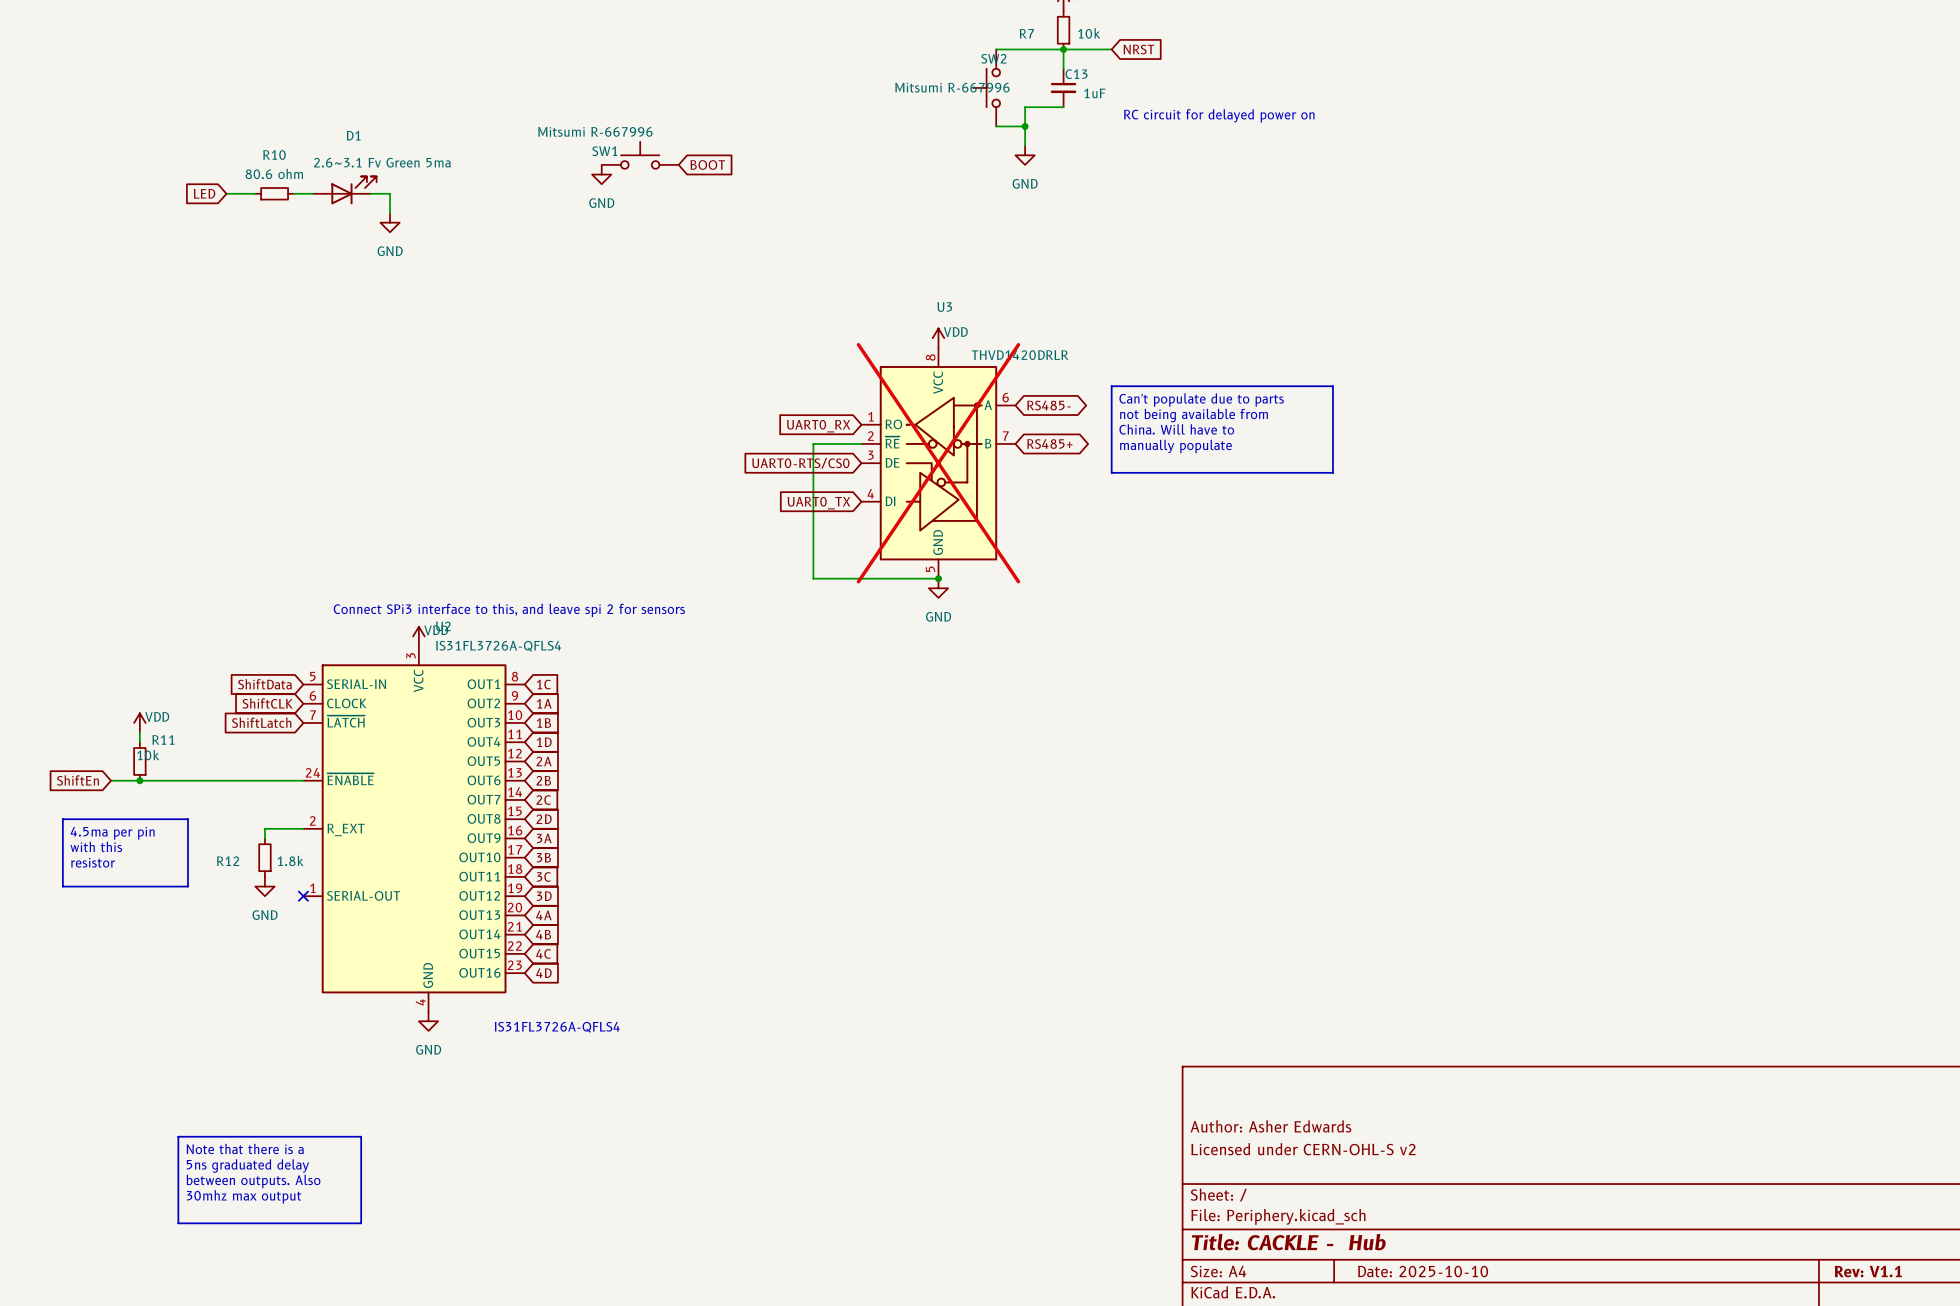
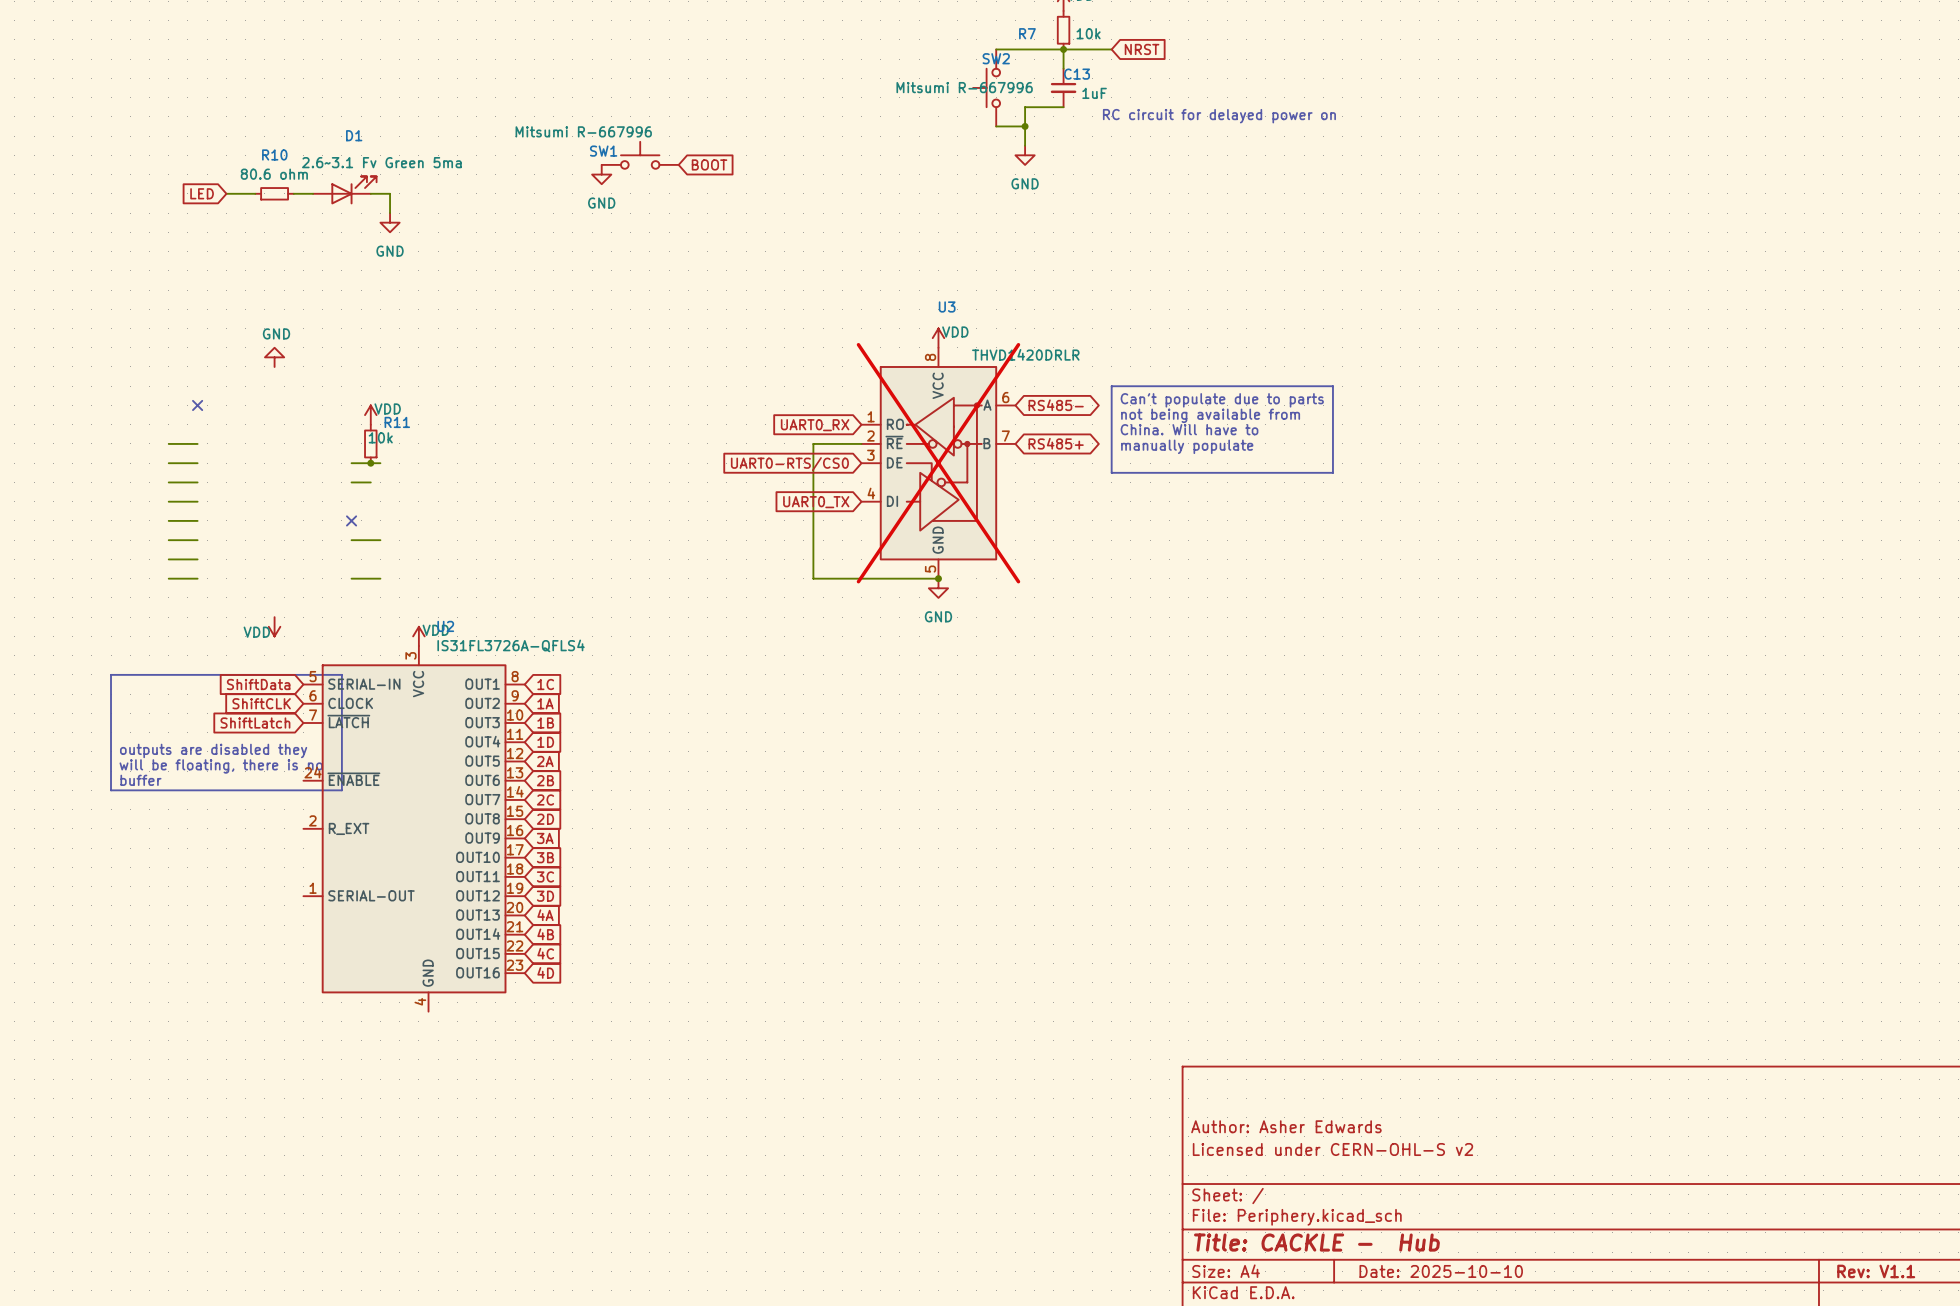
power symbol: none -> GND (274, 357)
no-connect mark: none -> (197, 405)
power symbol: none -> VDD (370, 415)
wire: none -> (168, 443) (197, 443)
wire: none -> (168, 463) (197, 463)
wire: none -> (351, 463) (380, 463)
junction: none -> (370, 463)
wire: none -> (168, 482) (197, 482)
wire: none -> (351, 482) (370, 482)
wire: none -> (168, 501) (197, 501)
wire: none -> (168, 520) (197, 520)
no-connect mark: none -> (351, 520)
wire: none -> (168, 540) (197, 540)
wire: none -> (351, 540) (380, 540)
wire: none -> (168, 559) (197, 559)
wire: none -> (168, 578) (197, 578)
wire: none -> (351, 578) (380, 578)
text: Connect SPi3 interface to this, and leave spi 2 for sensors (509, 610) -> none
line: none -> (111, 674) (341, 674) (341, 790) (111, 790) (111, 674)
power symbol rotation: 0° (139, 723) -> 180° (274, 626)
power symbol position: VDD (139, 723) -> VDD (274, 626)
wire: (139, 732) (139, 742) -> none
text: none -> outputs are disabled they (213, 750)
R11 position: (139, 761) -> (370, 443)
text: none -> will be floating, there is no (221, 766)
global label: ShiftEn (77, 780) -> none
wire: (111, 780) (303, 780) -> none
text: none -> buffer (140, 780)
junction: (139, 780) -> none
line: (62, 819) (187, 819) (187, 886) (62, 886) (62, 819) -> none
wire: (303, 828) (264, 828) (264, 838) -> none
text: 4.5ma per pin (112, 833) -> none
text: with this (96, 846) -> none
R12: 1.8k (264, 857) -> none
text: resistor (93, 862) -> none
power symbol: GND (264, 886) -> none
no-connect mark: (303, 896) -> none
power symbol: GND (428, 1021) -> none
text: IS31FL3726A-QFLS4 (557, 1027) -> none
line: (178, 1136) (361, 1136) (361, 1223) (178, 1223) (178, 1136) -> none
text: Note that there is a (245, 1148) -> none
text: 5ns graduated delay (247, 1166) -> none
text: between outputs. Also (253, 1181) -> none
text: 30mhz max output (244, 1196) -> none

